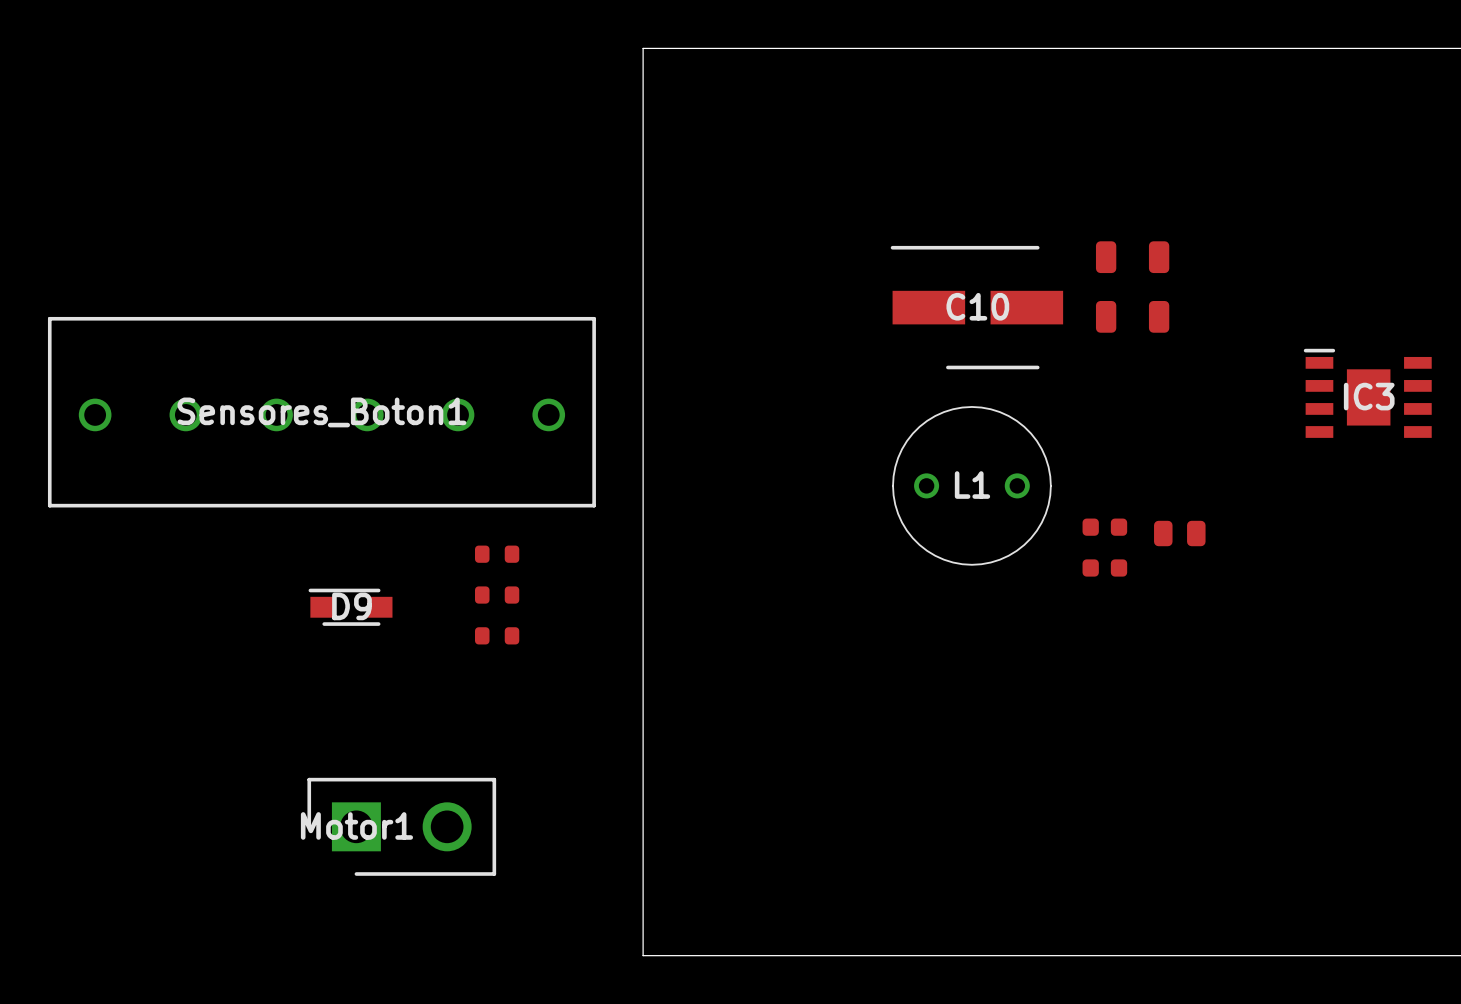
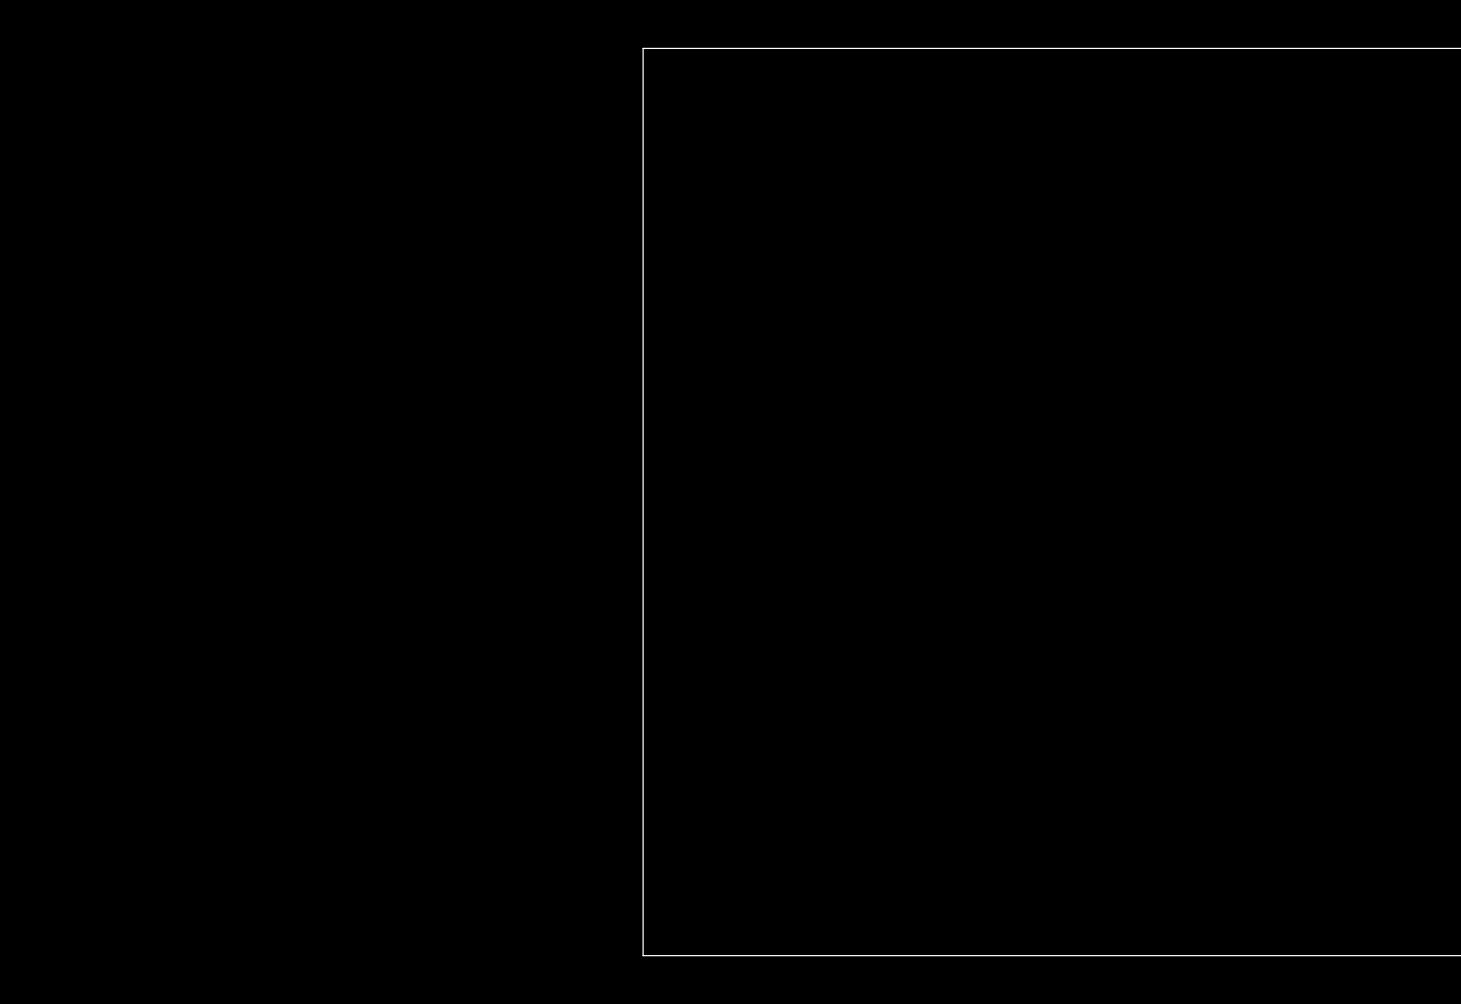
part: (1132, 257) -> none
C10: (976, 307) -> none
part: (1132, 316) -> none
IC3: (1367, 393) -> none
Sensores_Boton1: (321, 412) -> none
L1: (971, 485) -> none
part: (1104, 527) -> none
part: (1179, 533) -> none
part: (497, 554) -> none
part: (1104, 567) -> none
part: (497, 595) -> none
D9: (350, 607) -> none
part: (497, 635) -> none
Motor1: (401, 826) -> none

